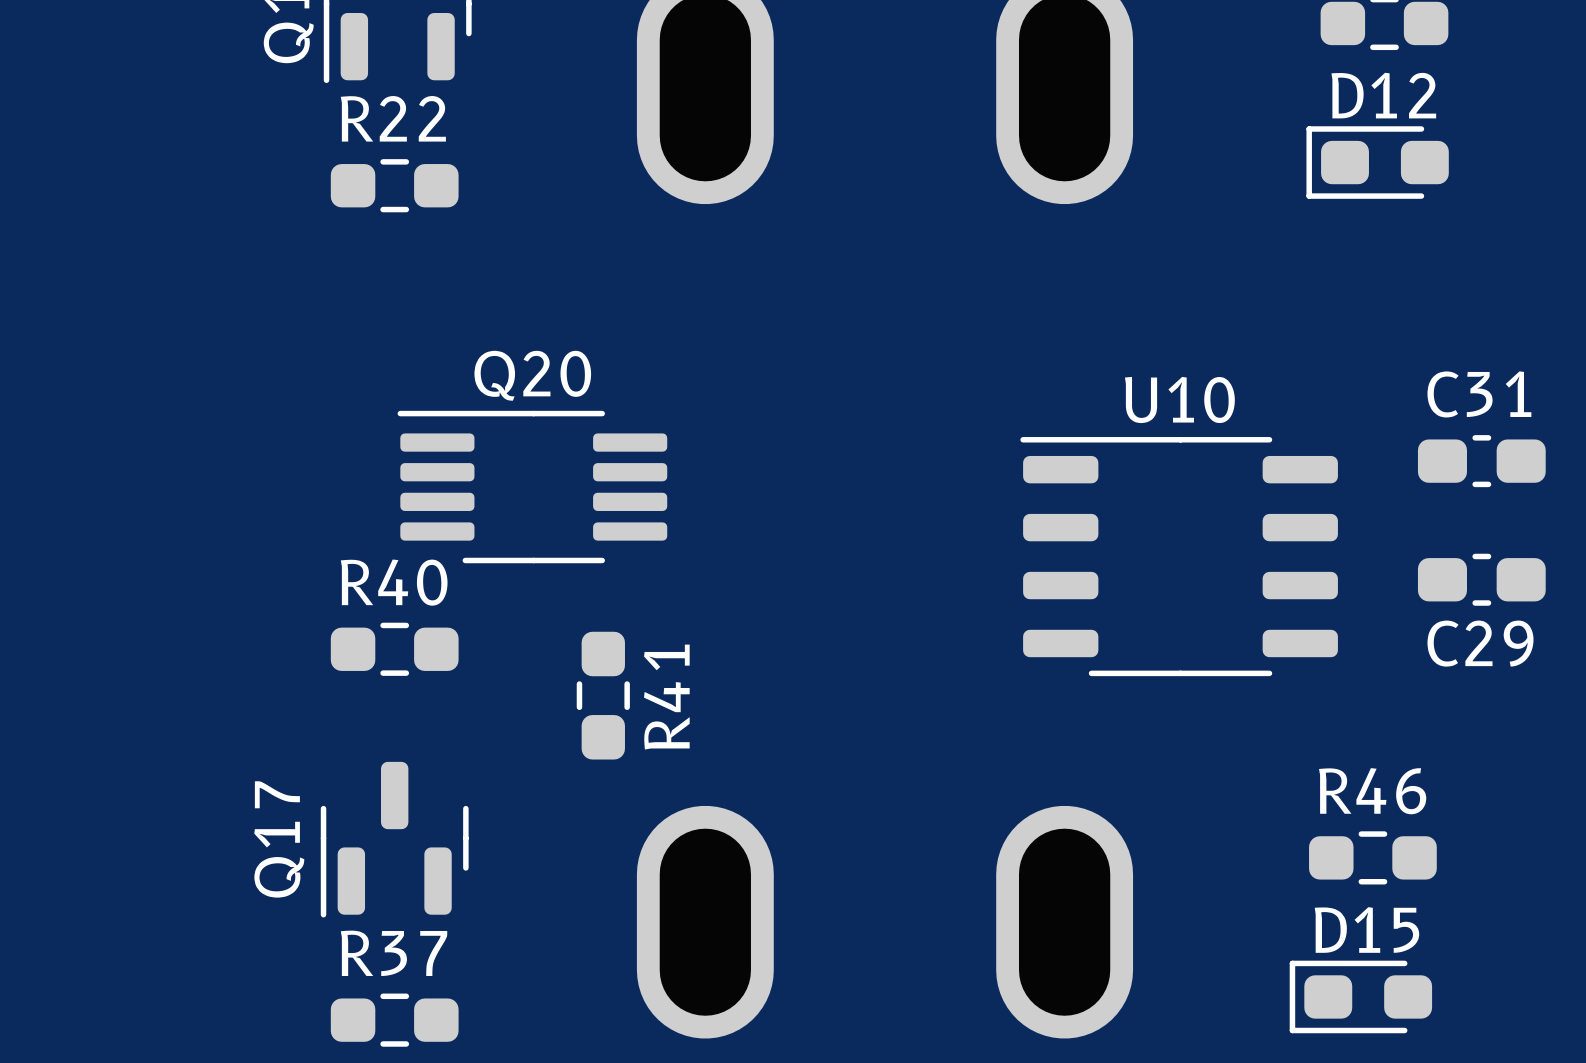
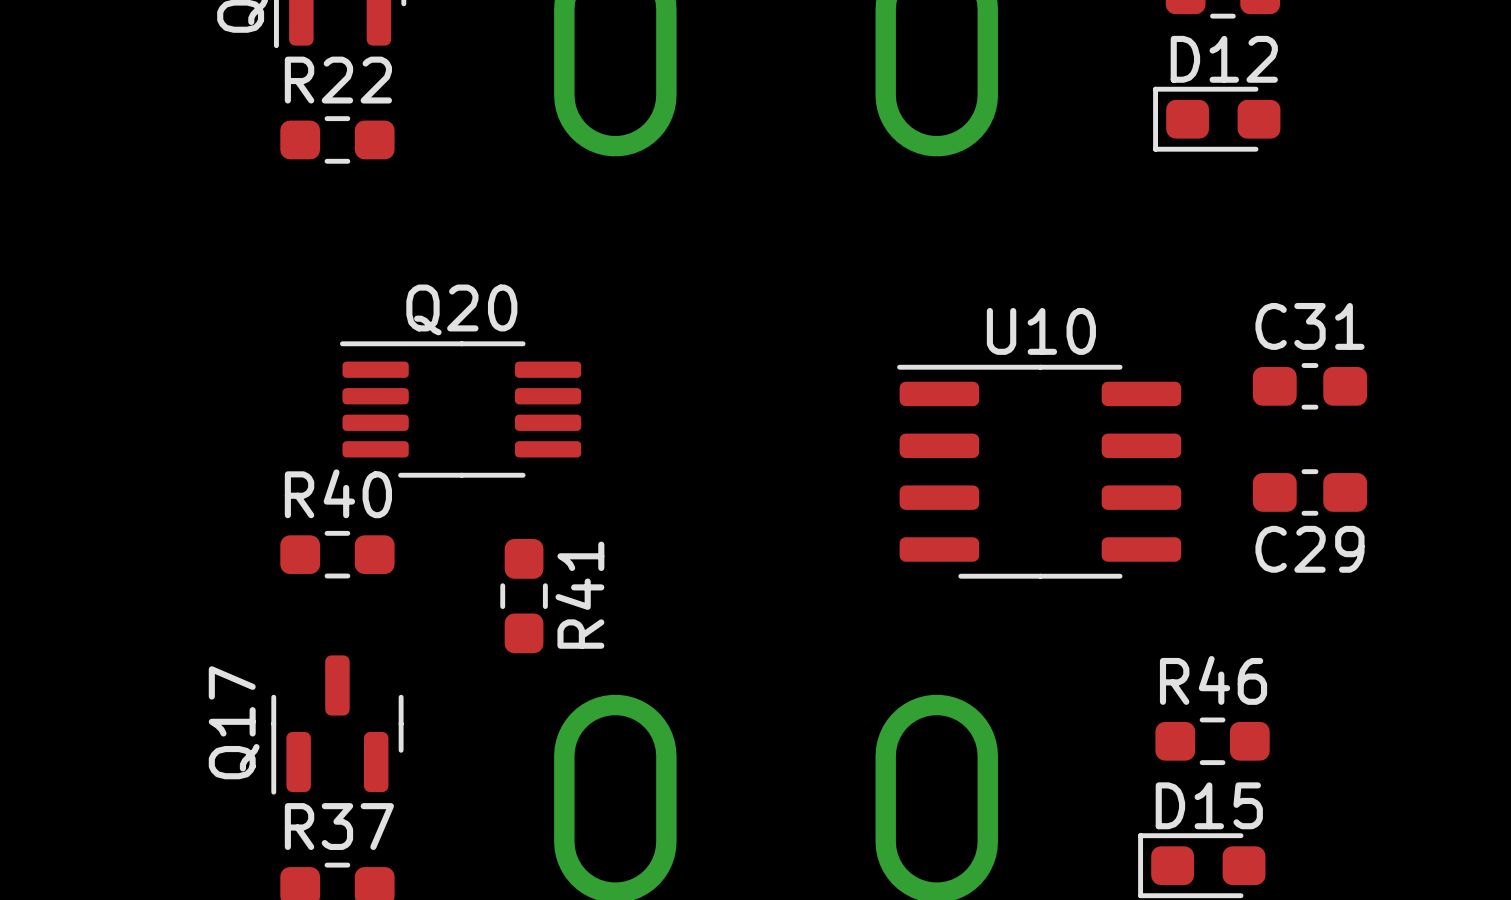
U10 footprint: [1020, 437, 1338, 677] -> [897, 364, 1182, 579]

